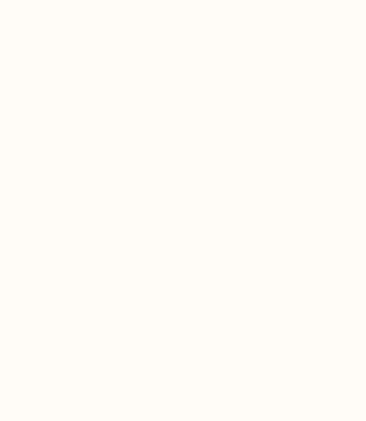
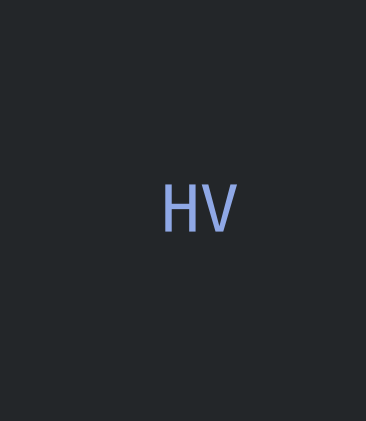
text: none -> HV (201, 208)

